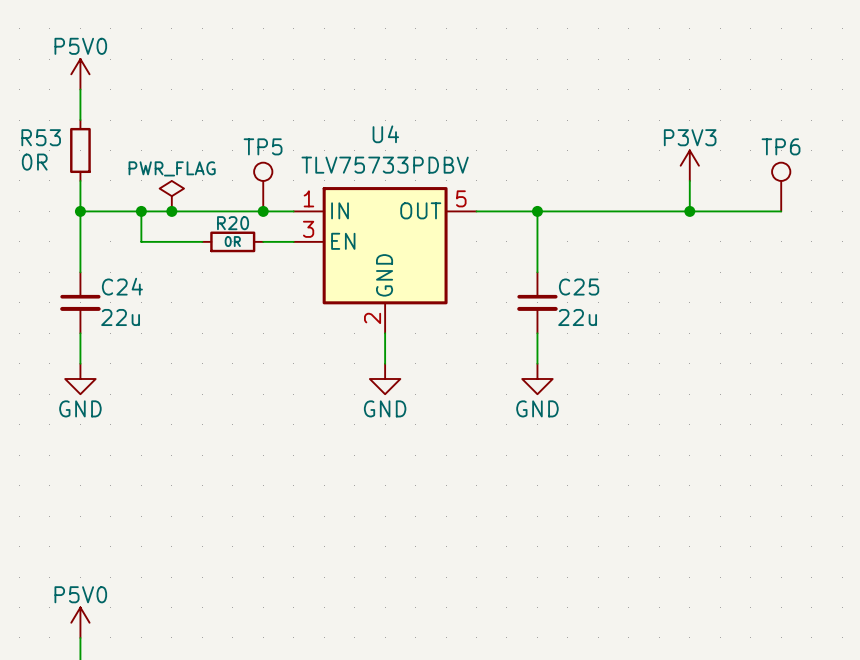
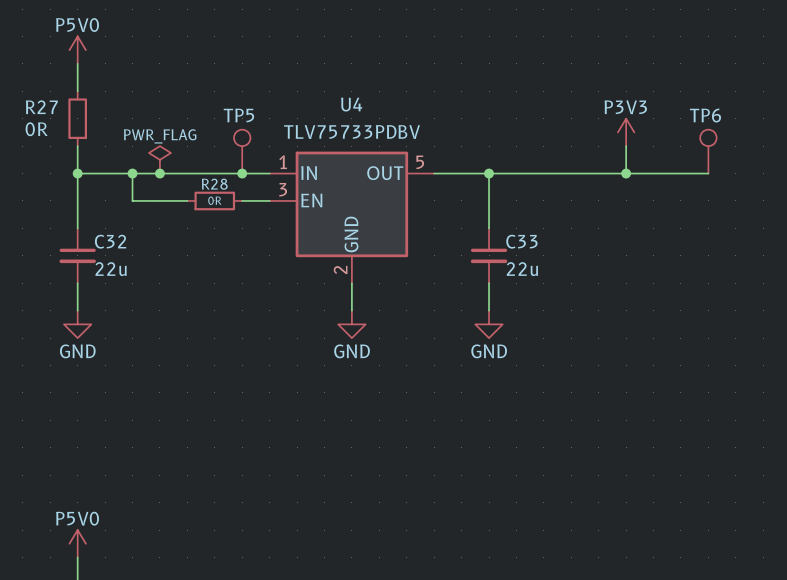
R53 name: R53 (41, 137) -> R27 (41, 107)
R20 name: R20 (233, 223) -> R28 (214, 184)
C24 name: C24 (122, 286) -> C32 (110, 241)
C25 name: C25 (579, 287) -> C33 (521, 241)

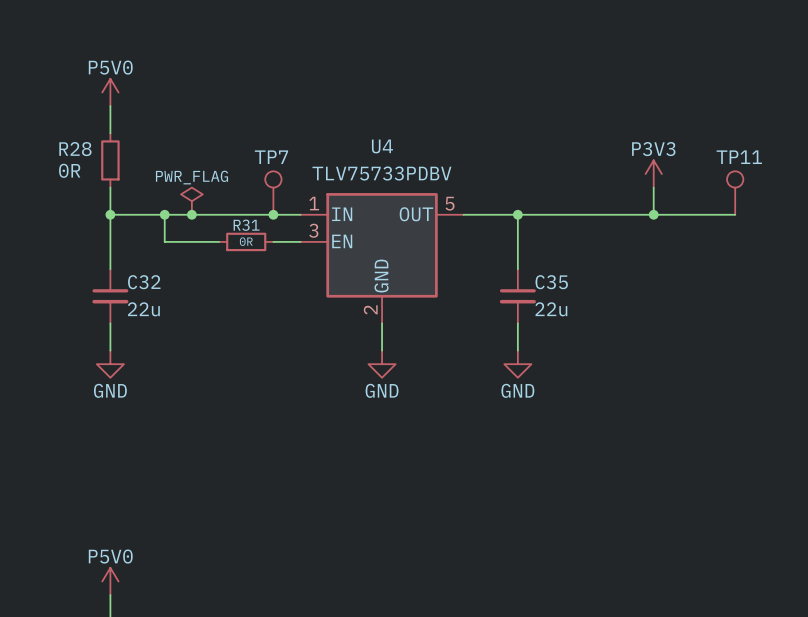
R27 name: R27 (41, 107) -> R28 (75, 149)
TP5 name: TP5 (238, 115) -> TP7 (271, 157)
TP6 name: TP6 (705, 115) -> TP11 (739, 157)
R28 name: R28 (214, 184) -> R31 (246, 225)
C33 name: C33 (521, 241) -> C35 (551, 282)

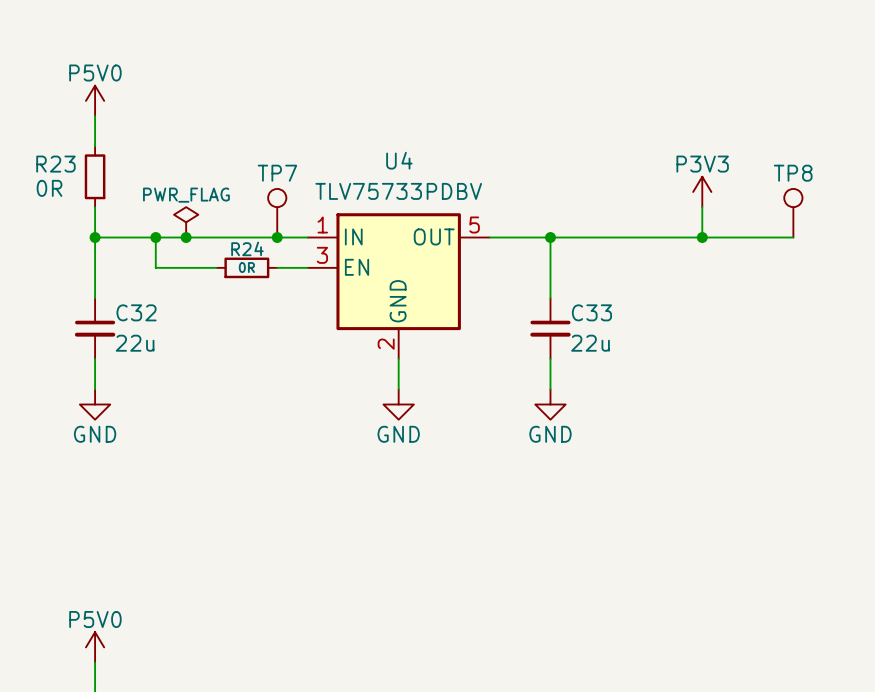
R28 name: R28 (75, 149) -> R23 (55, 164)
TP11 name: TP11 (739, 157) -> TP8 (793, 173)
R31 name: R31 (246, 225) -> R24 (247, 248)
C35 name: C35 (551, 282) -> C33 (591, 312)

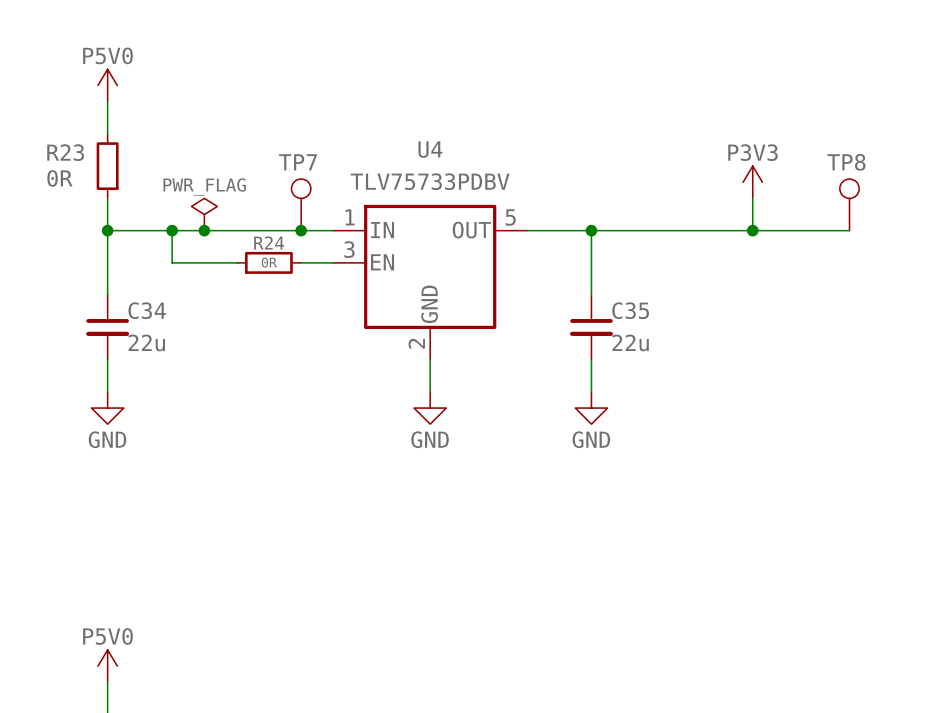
C32 name: C32 (136, 312) -> C34 (147, 310)
C33 name: C33 (591, 312) -> C35 (630, 310)

